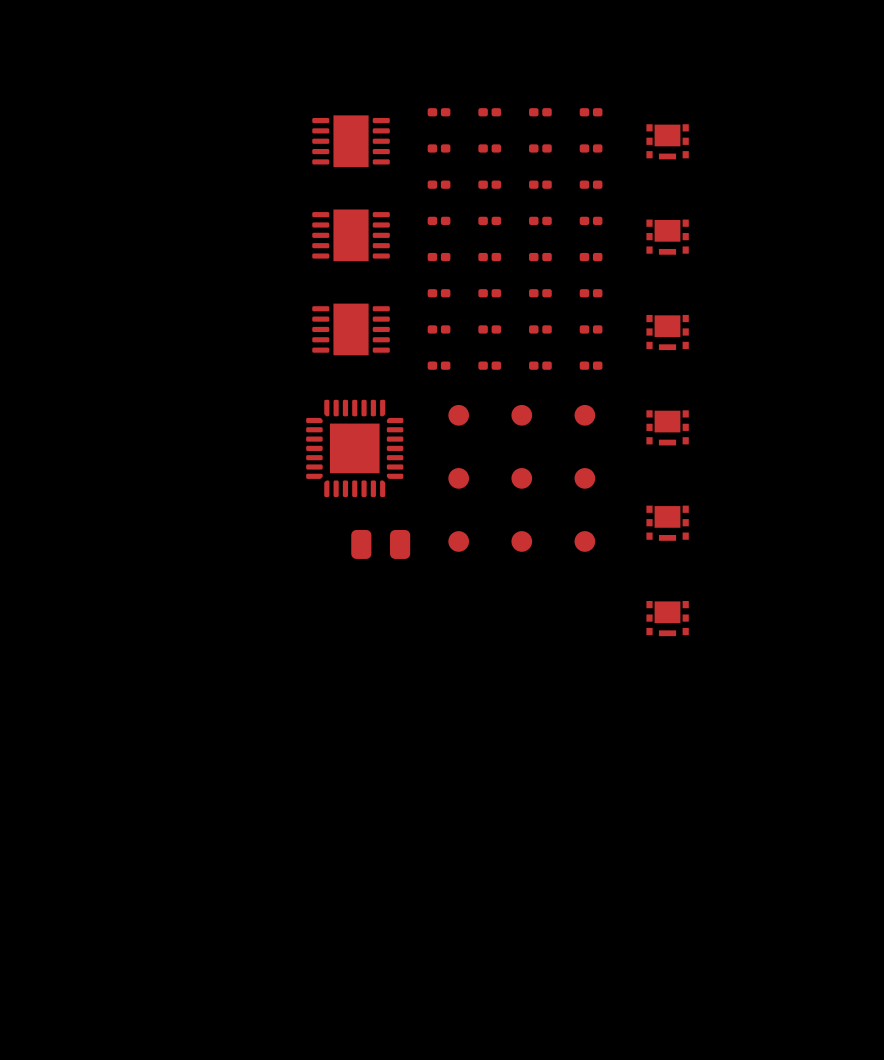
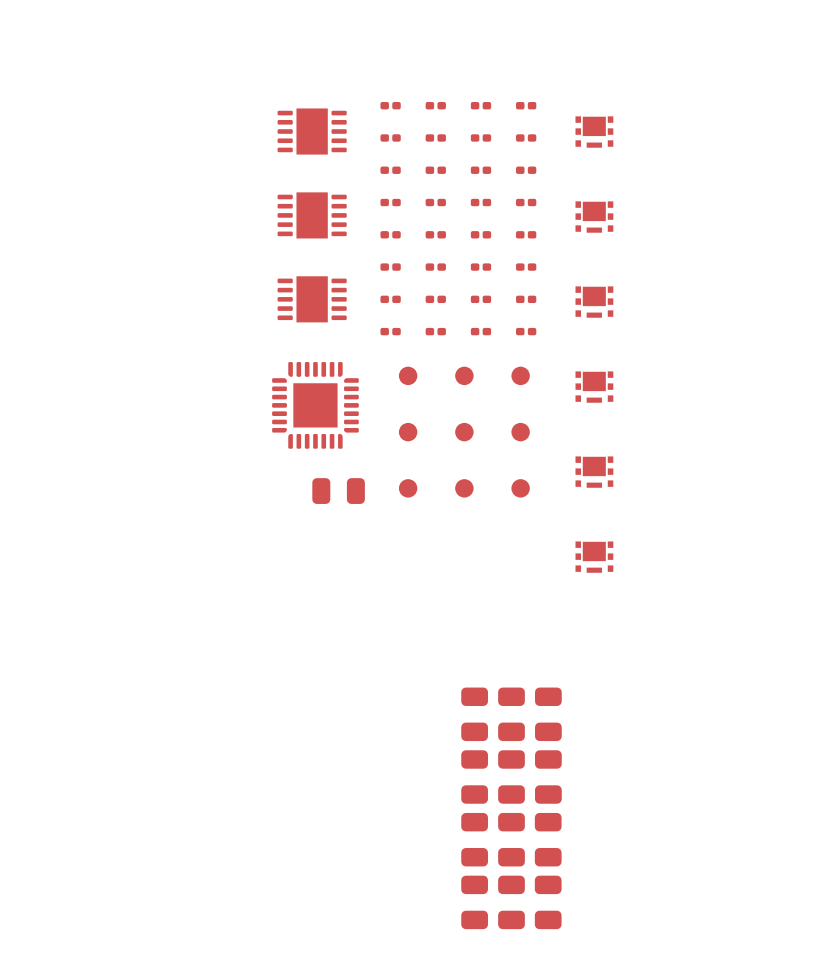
part: none -> (474, 714)
part: none -> (511, 714)
part: none -> (548, 714)
part: none -> (474, 776)
part: none -> (511, 776)
part: none -> (548, 776)
part: none -> (474, 839)
part: none -> (511, 839)
part: none -> (548, 839)
part: none -> (474, 902)
part: none -> (511, 902)
part: none -> (548, 902)

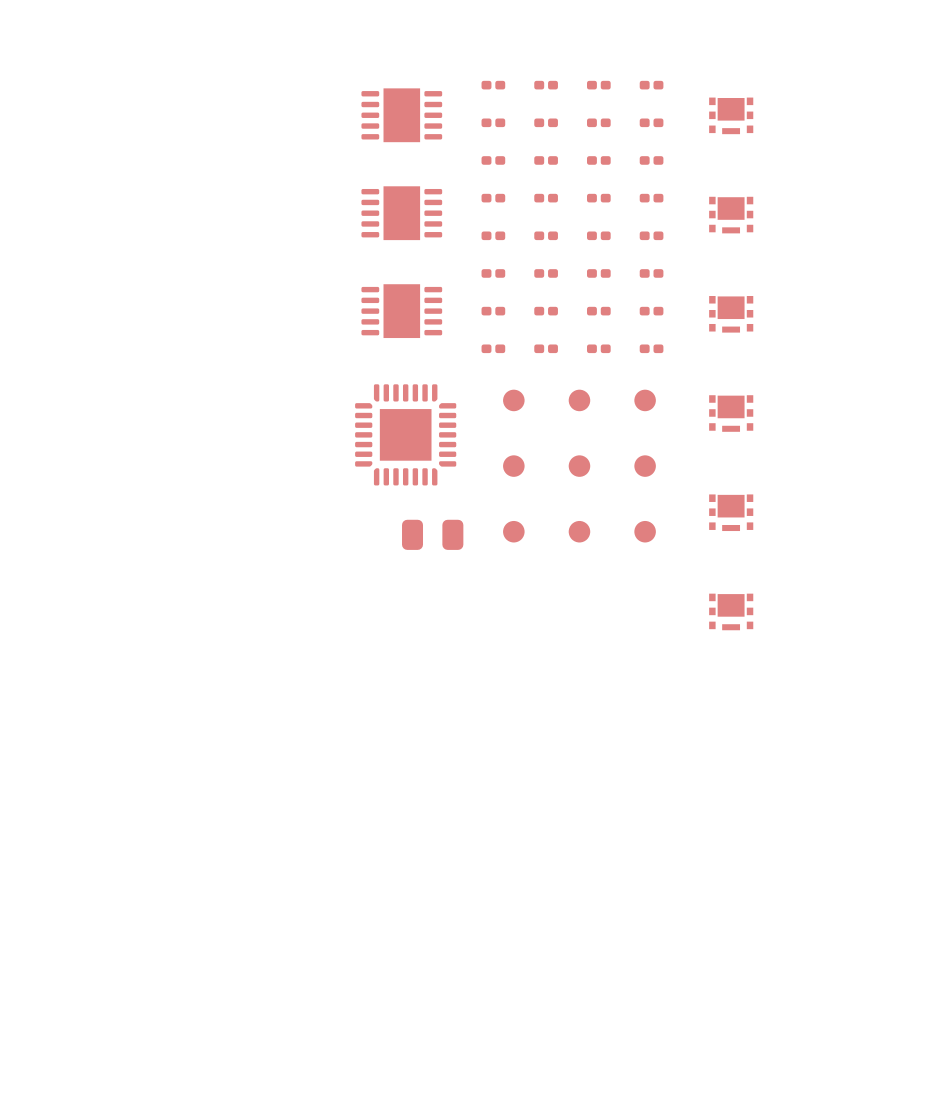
part: (474, 714) -> none
part: (511, 714) -> none
part: (548, 714) -> none
part: (474, 776) -> none
part: (511, 776) -> none
part: (548, 776) -> none
part: (474, 839) -> none
part: (511, 839) -> none
part: (548, 839) -> none
part: (474, 902) -> none
part: (511, 902) -> none
part: (548, 902) -> none

